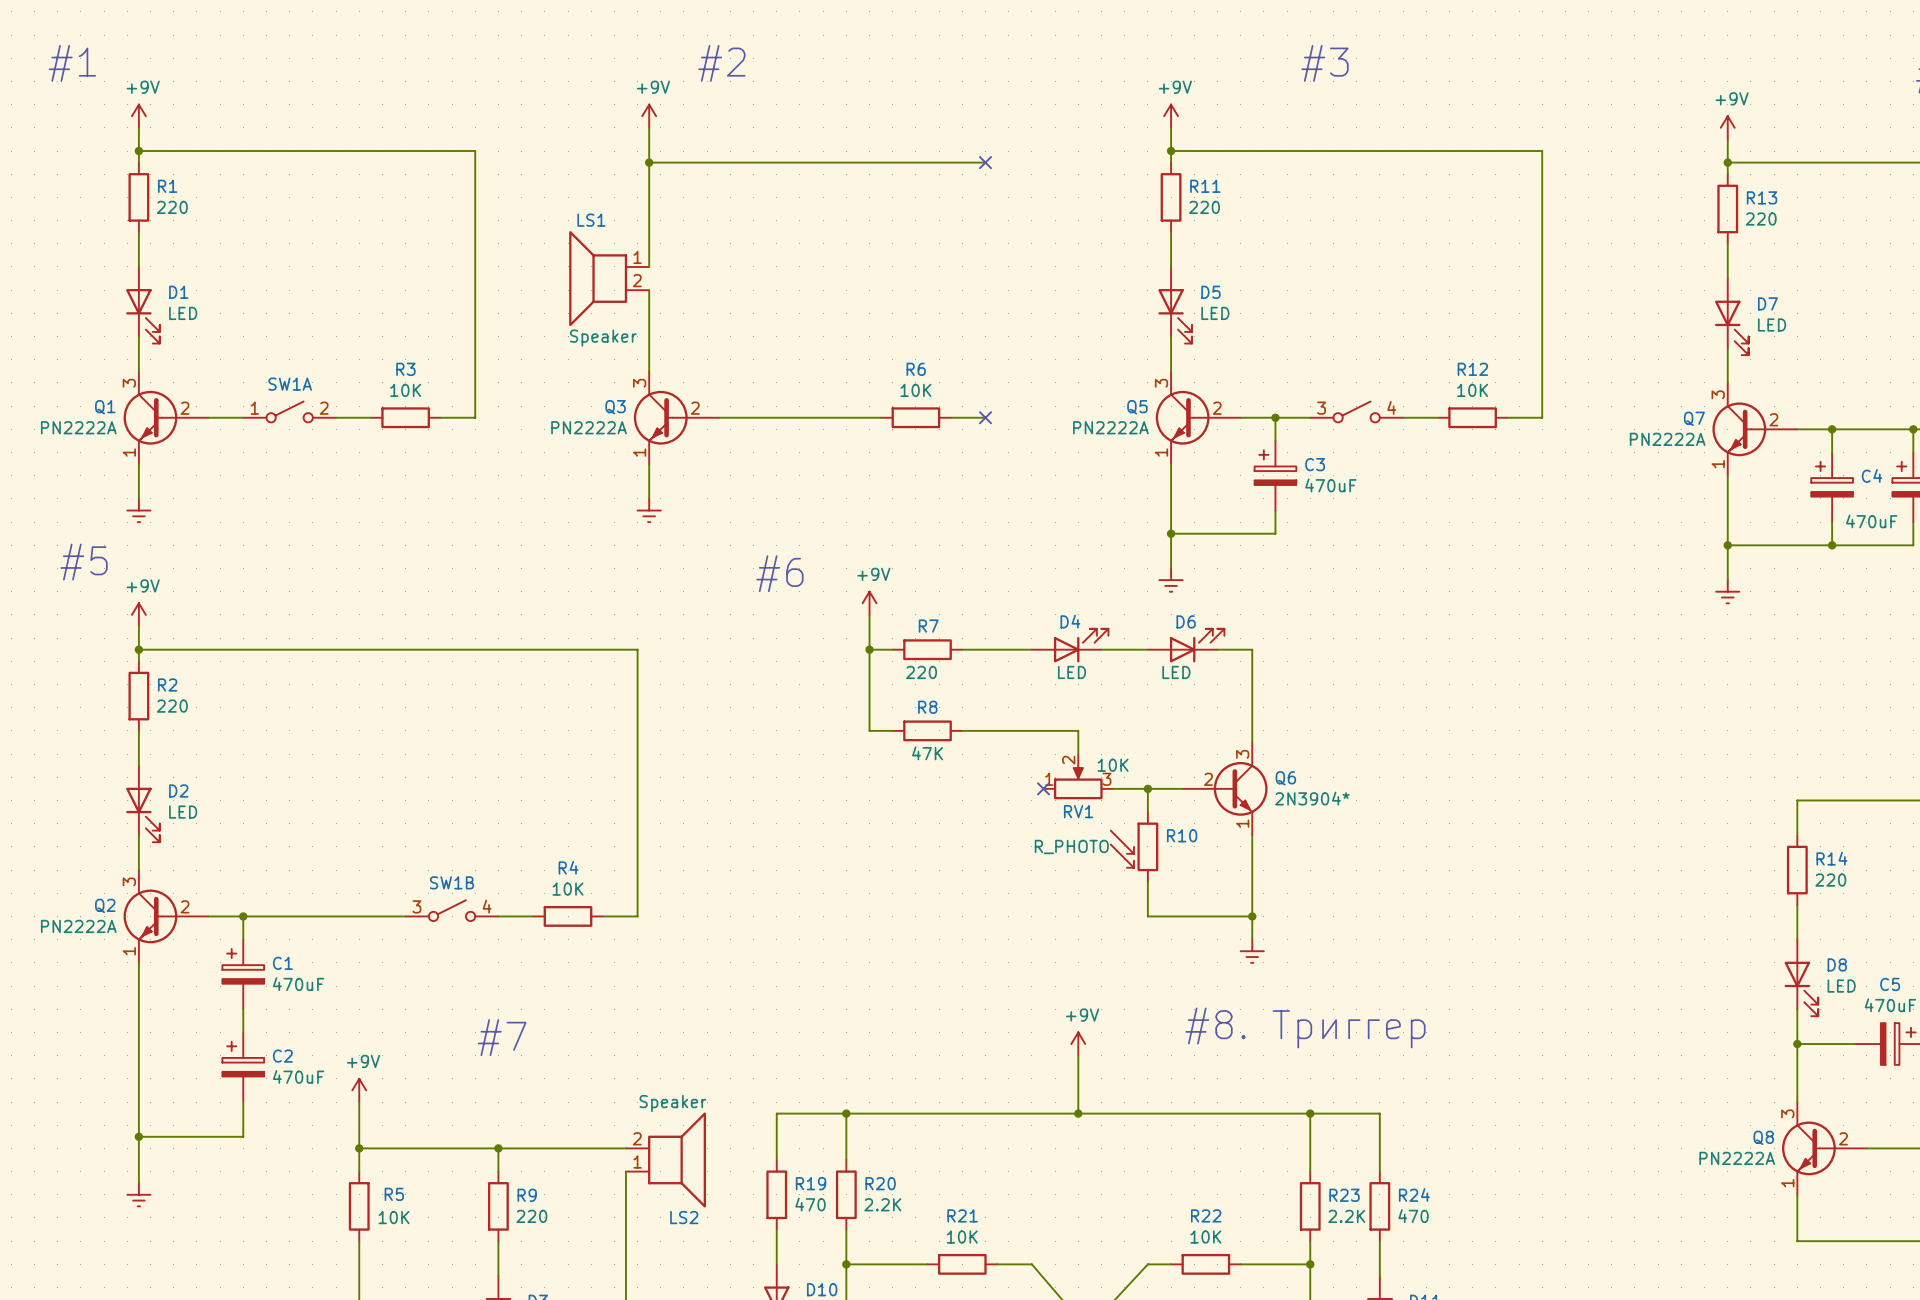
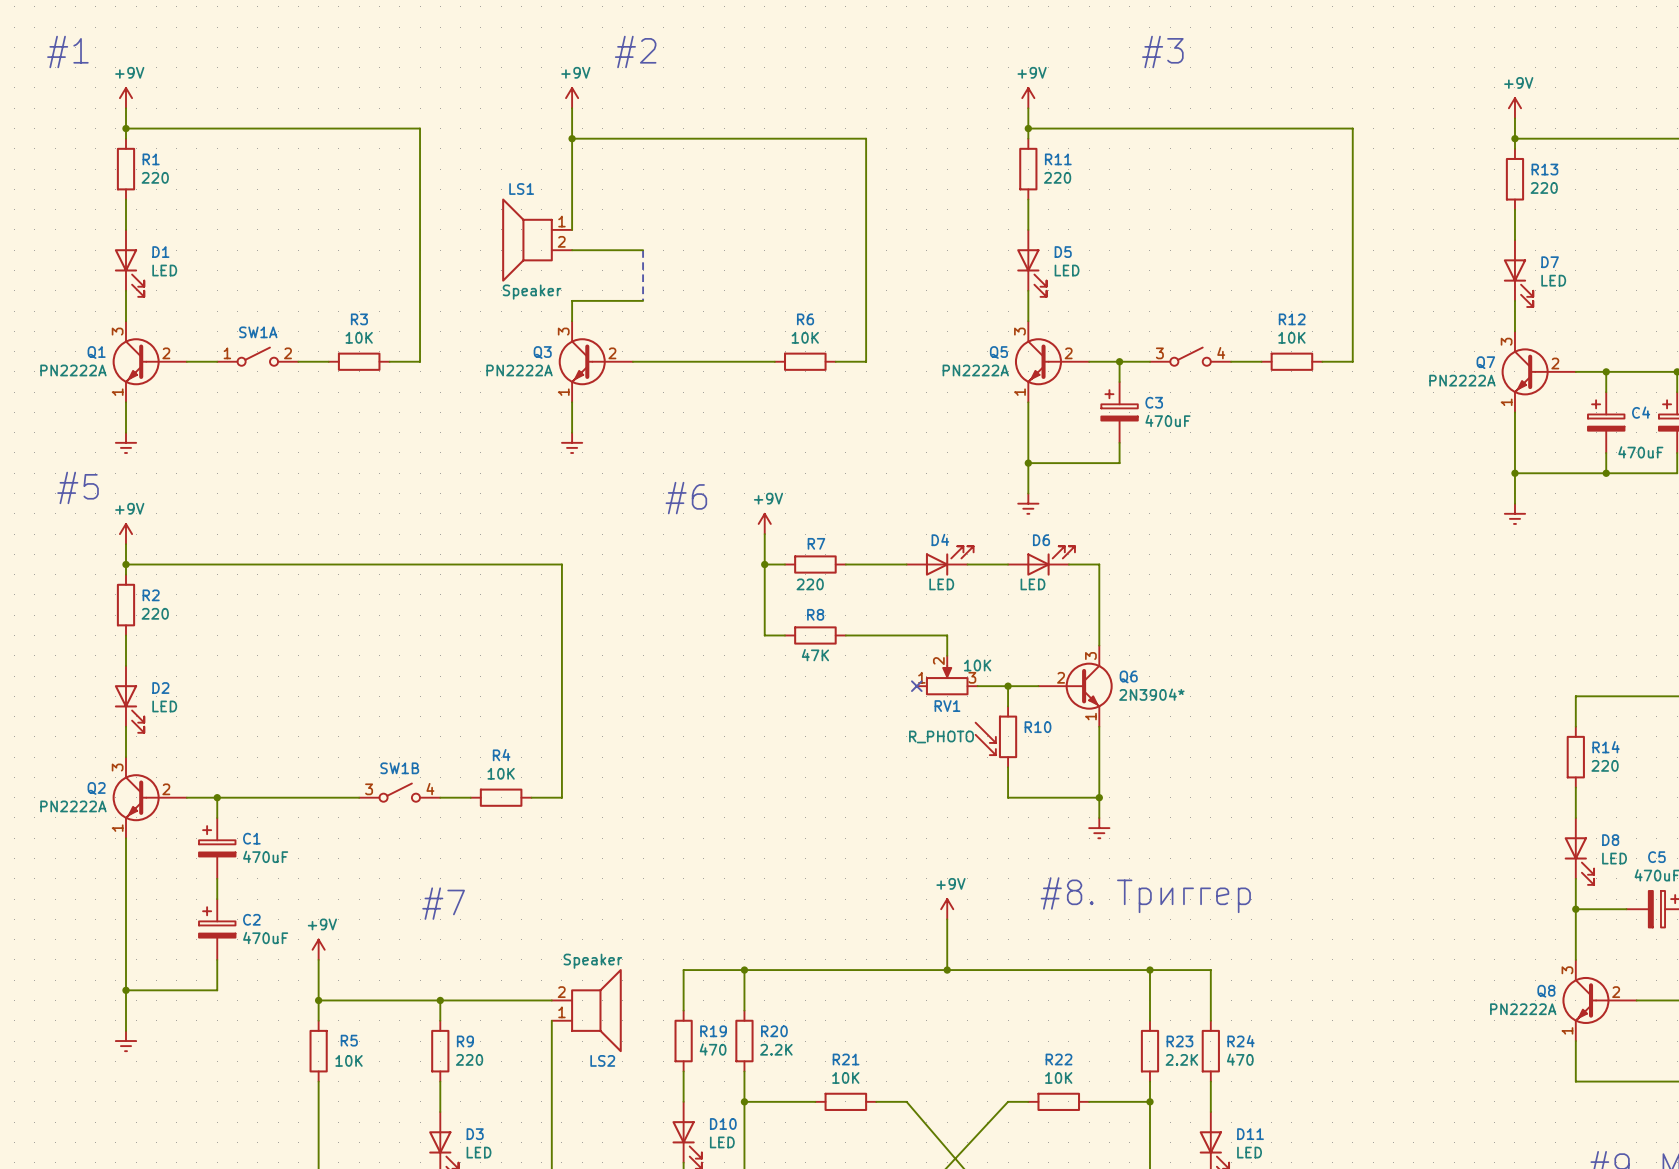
wire: none -> (866, 138) (866, 361)
no-connect mark: (985, 162) -> none
wire: (649, 290) (649, 348) -> (572, 250) (643, 250)
line: none -> (643, 250) (643, 300)
wire: none -> (572, 300) (643, 300)
no-connect mark: (985, 417) -> none

